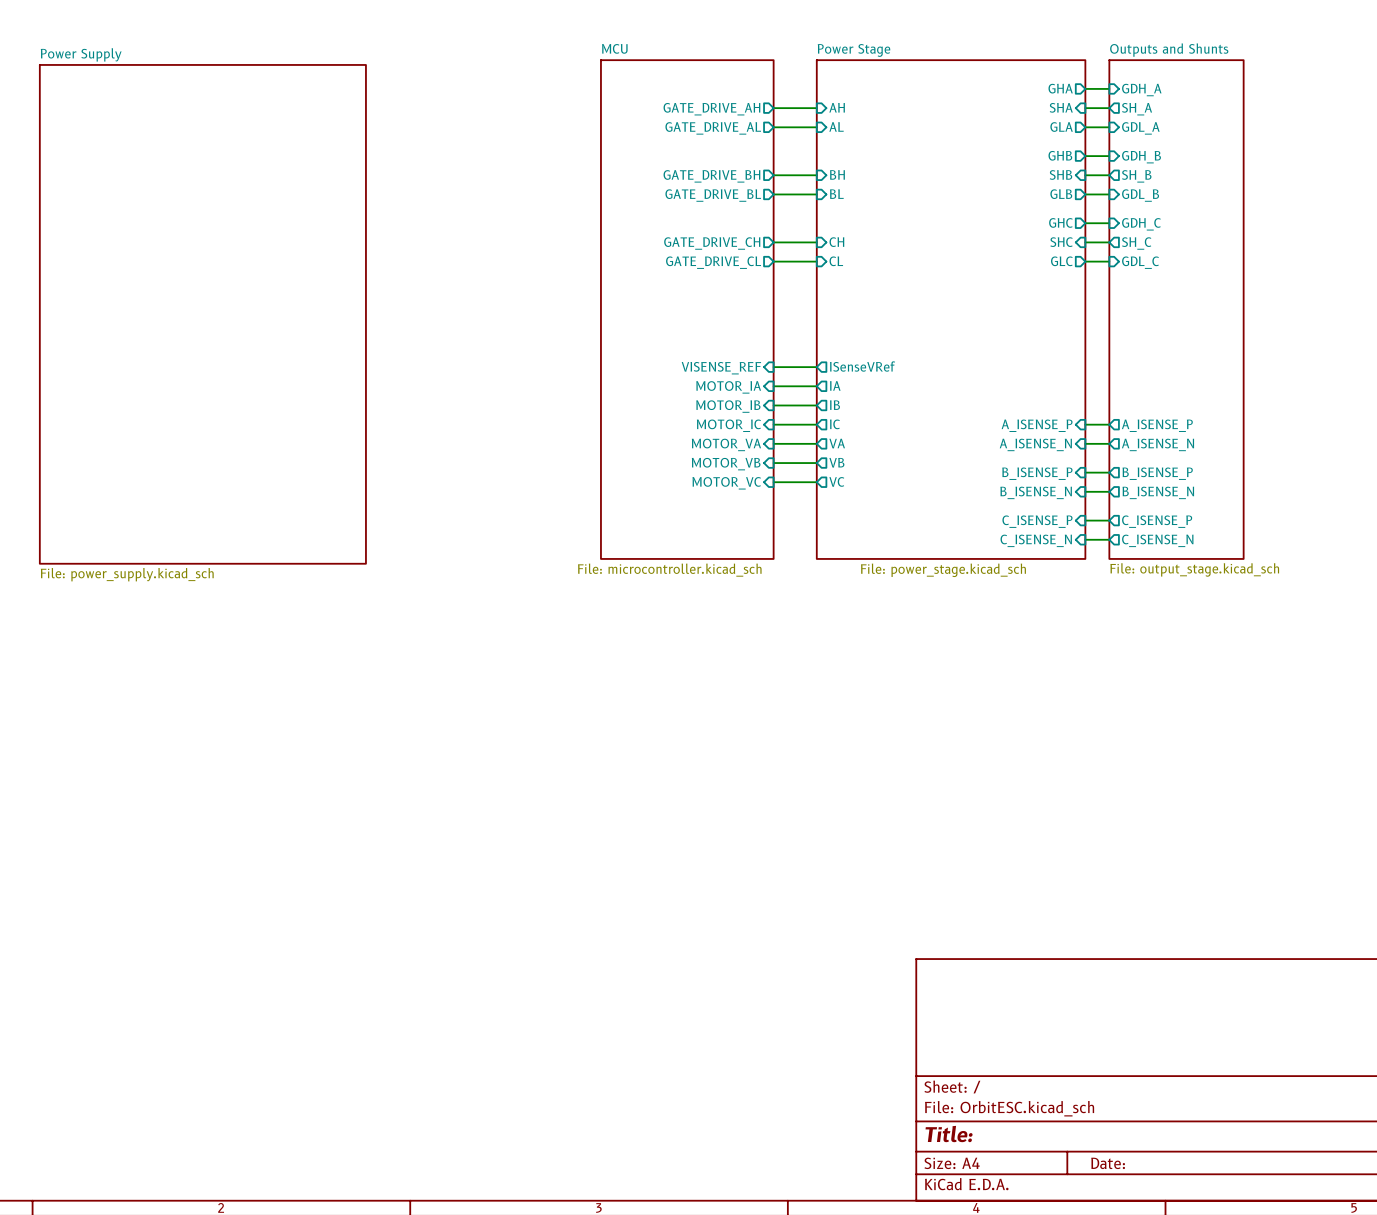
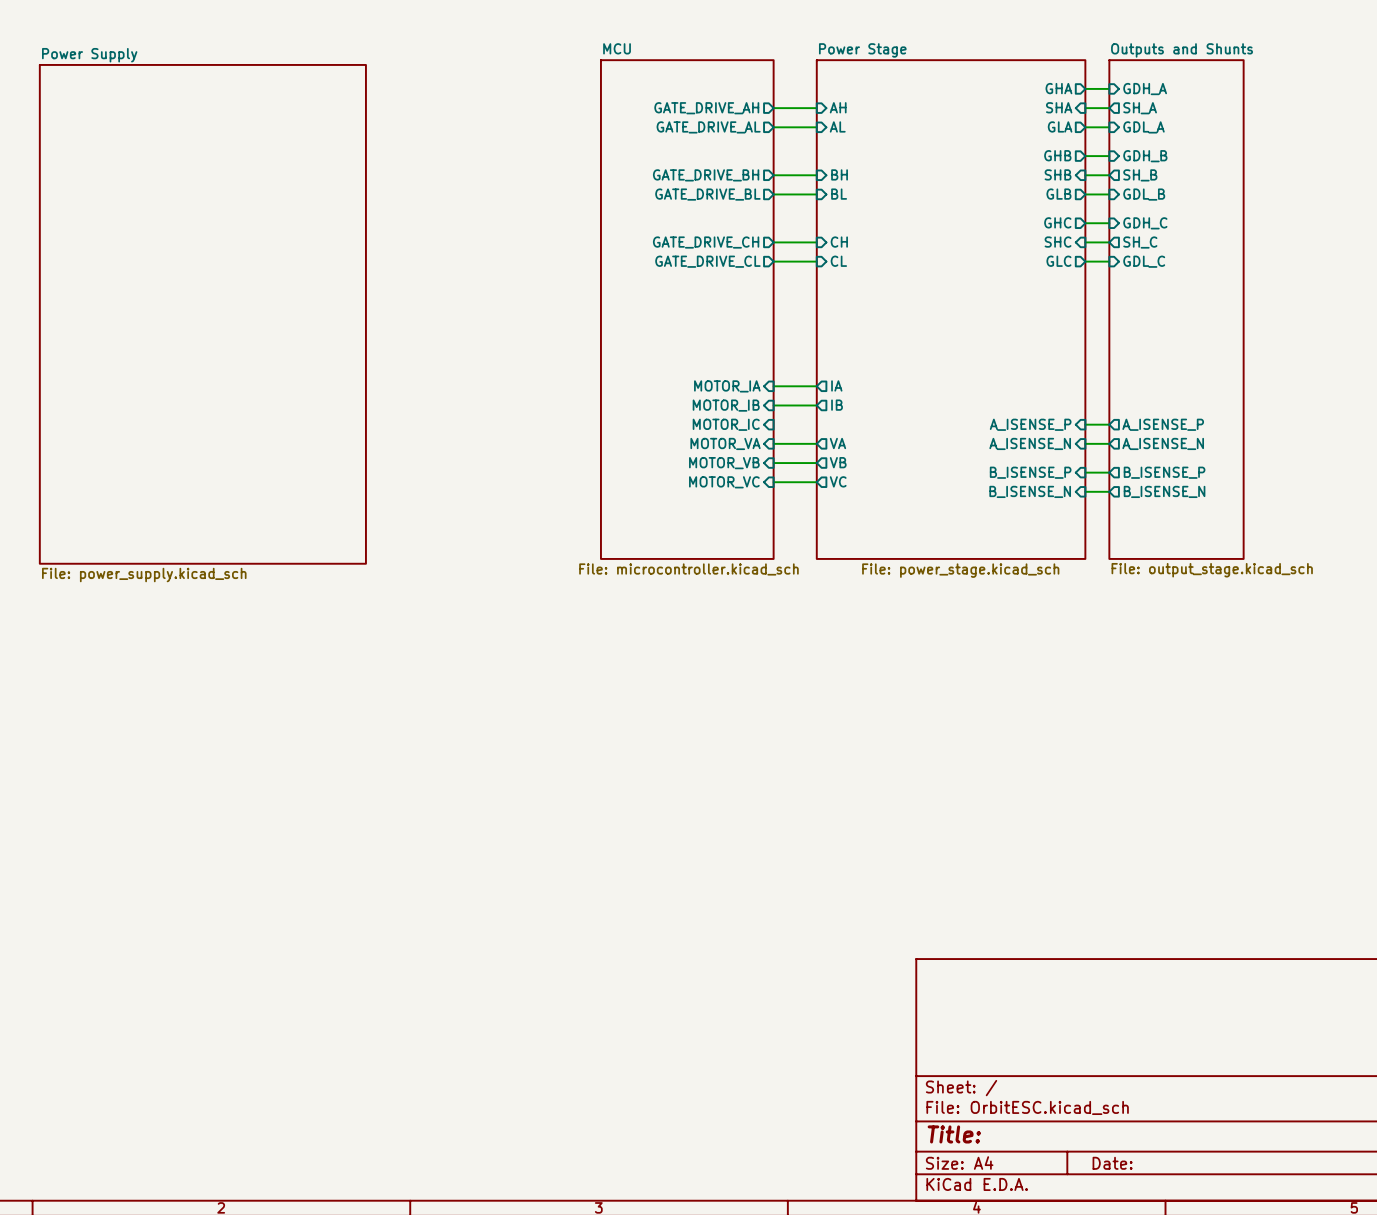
sheet pin: ISenseVRef (862, 366) -> none
wire: (773, 367) (816, 367) -> none
sheet pin: VISENSE_REF (721, 368) -> none
wire: (773, 424) (816, 424) -> none
sheet pin: IC (834, 424) -> none
wire: (1085, 520) (1109, 520) -> none
sheet pin: C_ISENSE_P (1037, 521) -> none
sheet pin: C_ISENSE_P (1157, 521) -> none
wire: (1085, 539) (1109, 539) -> none
sheet pin: C_ISENSE_N (1036, 540) -> none
sheet pin: C_ISENSE_N (1157, 540) -> none

